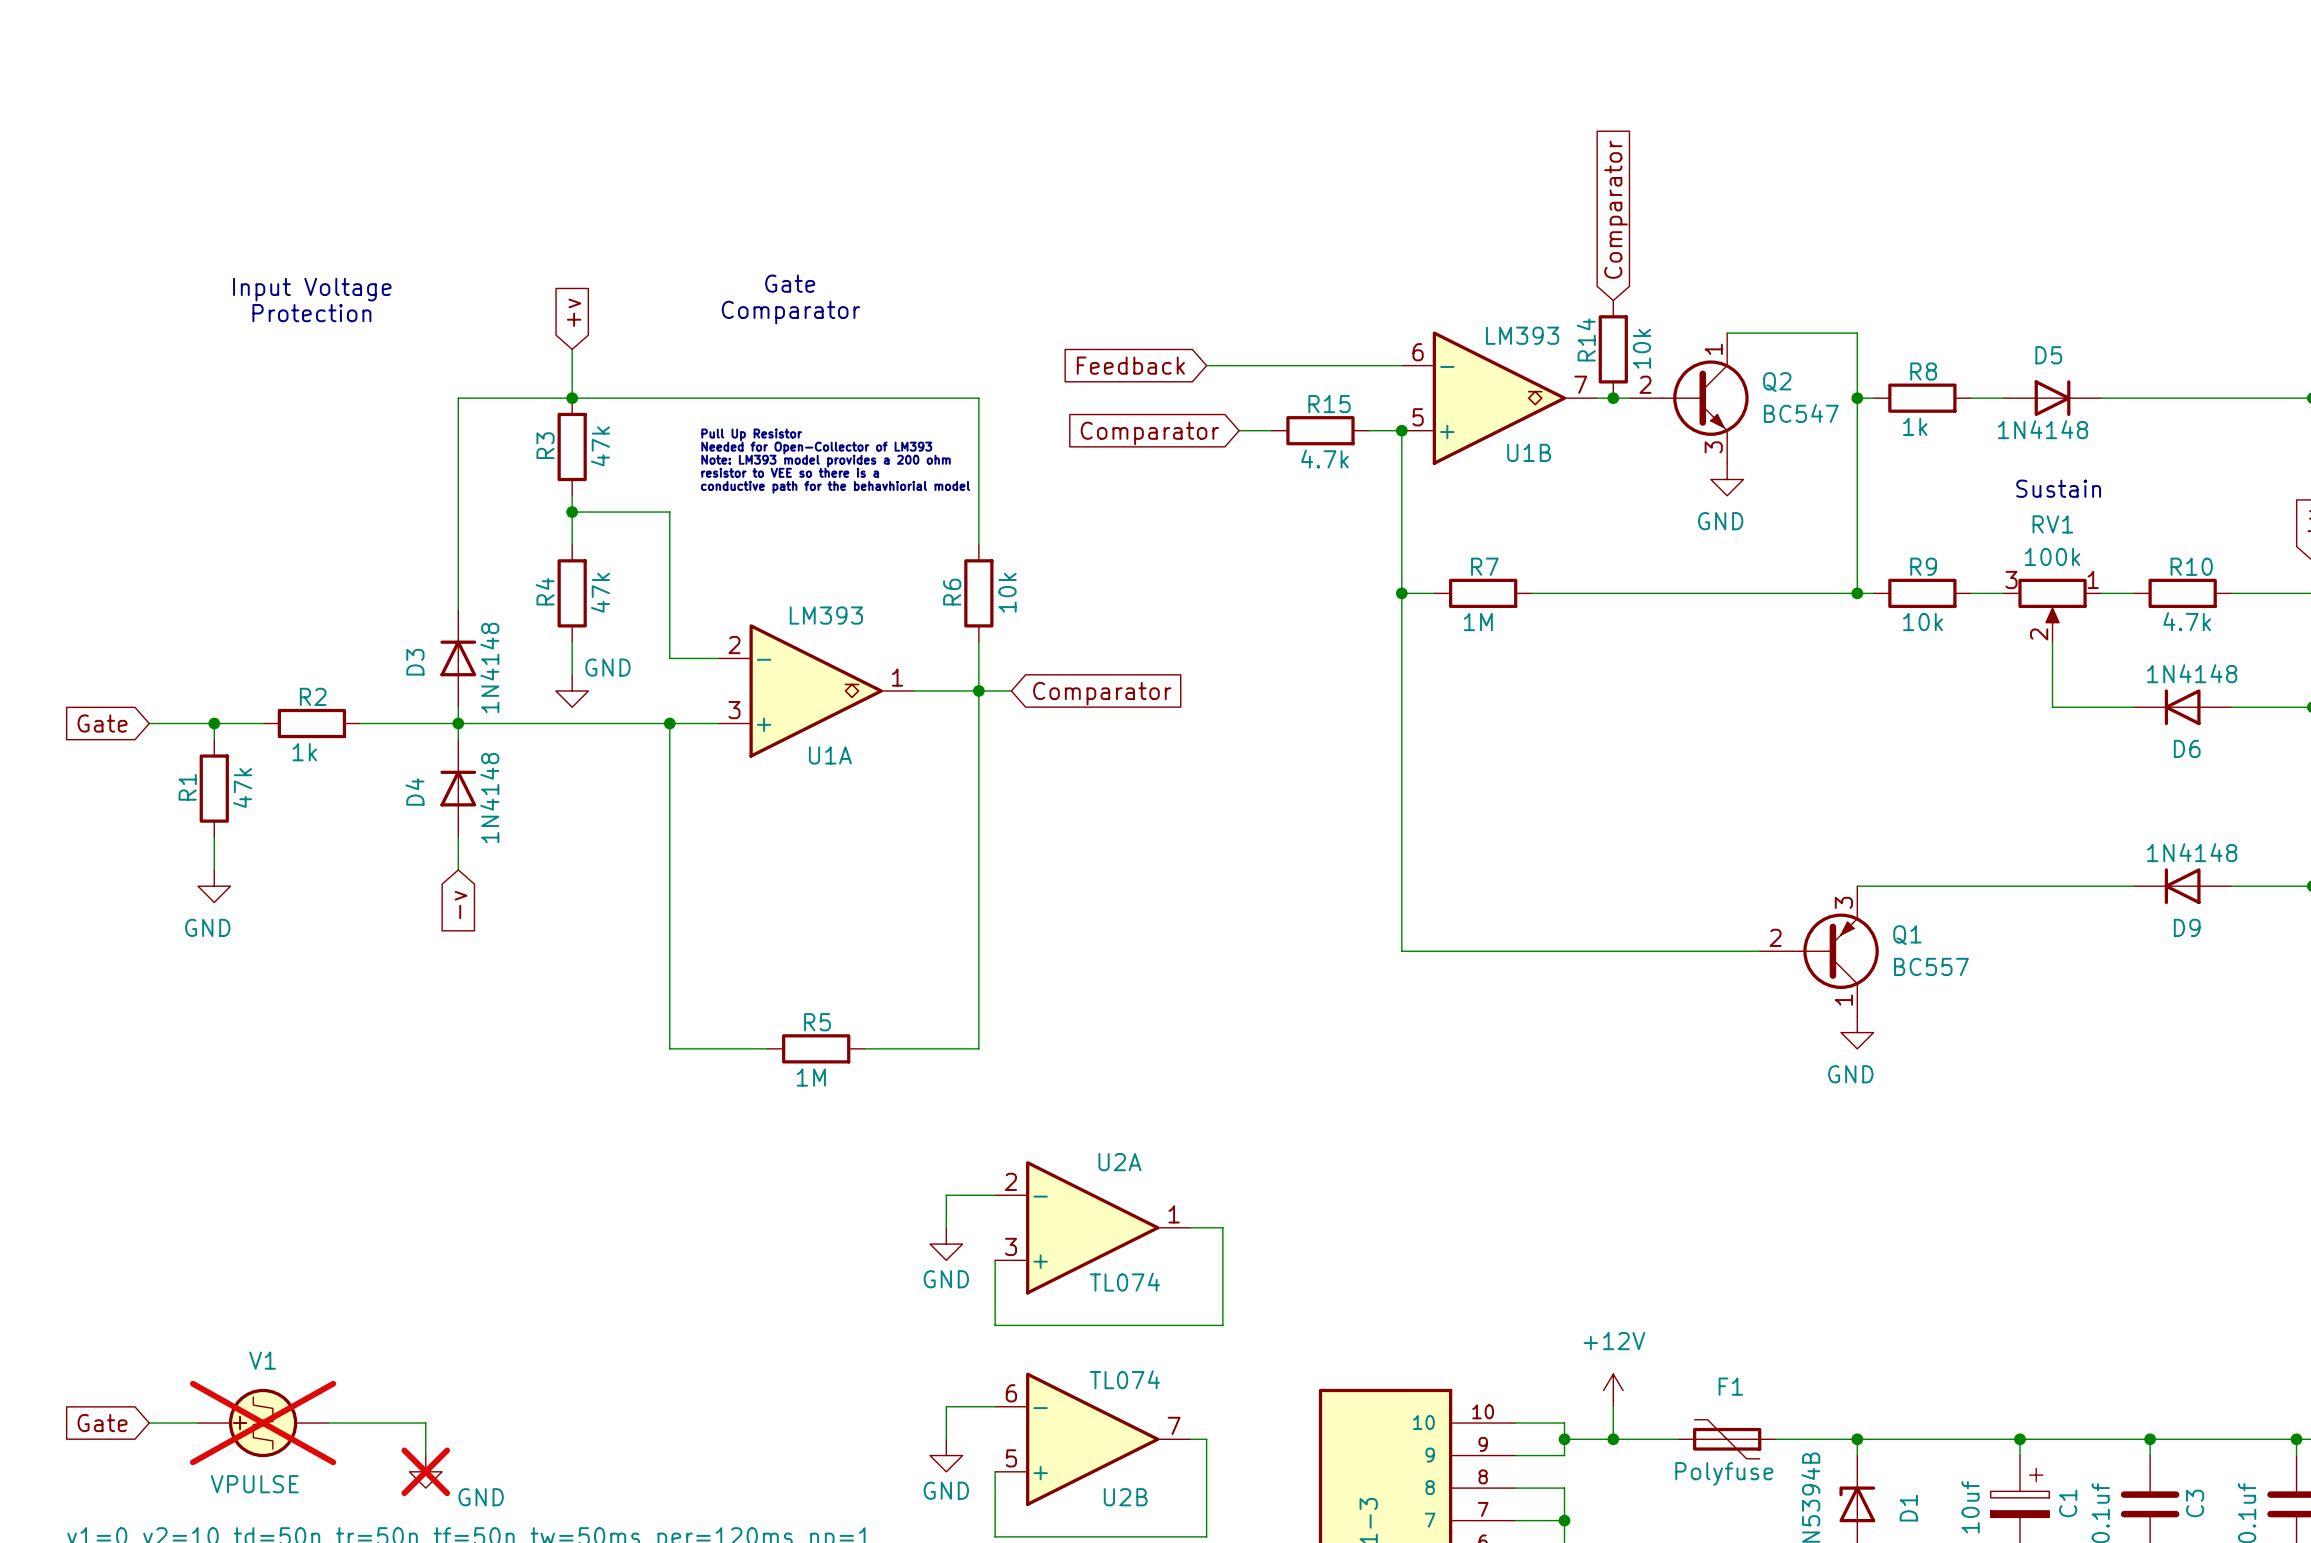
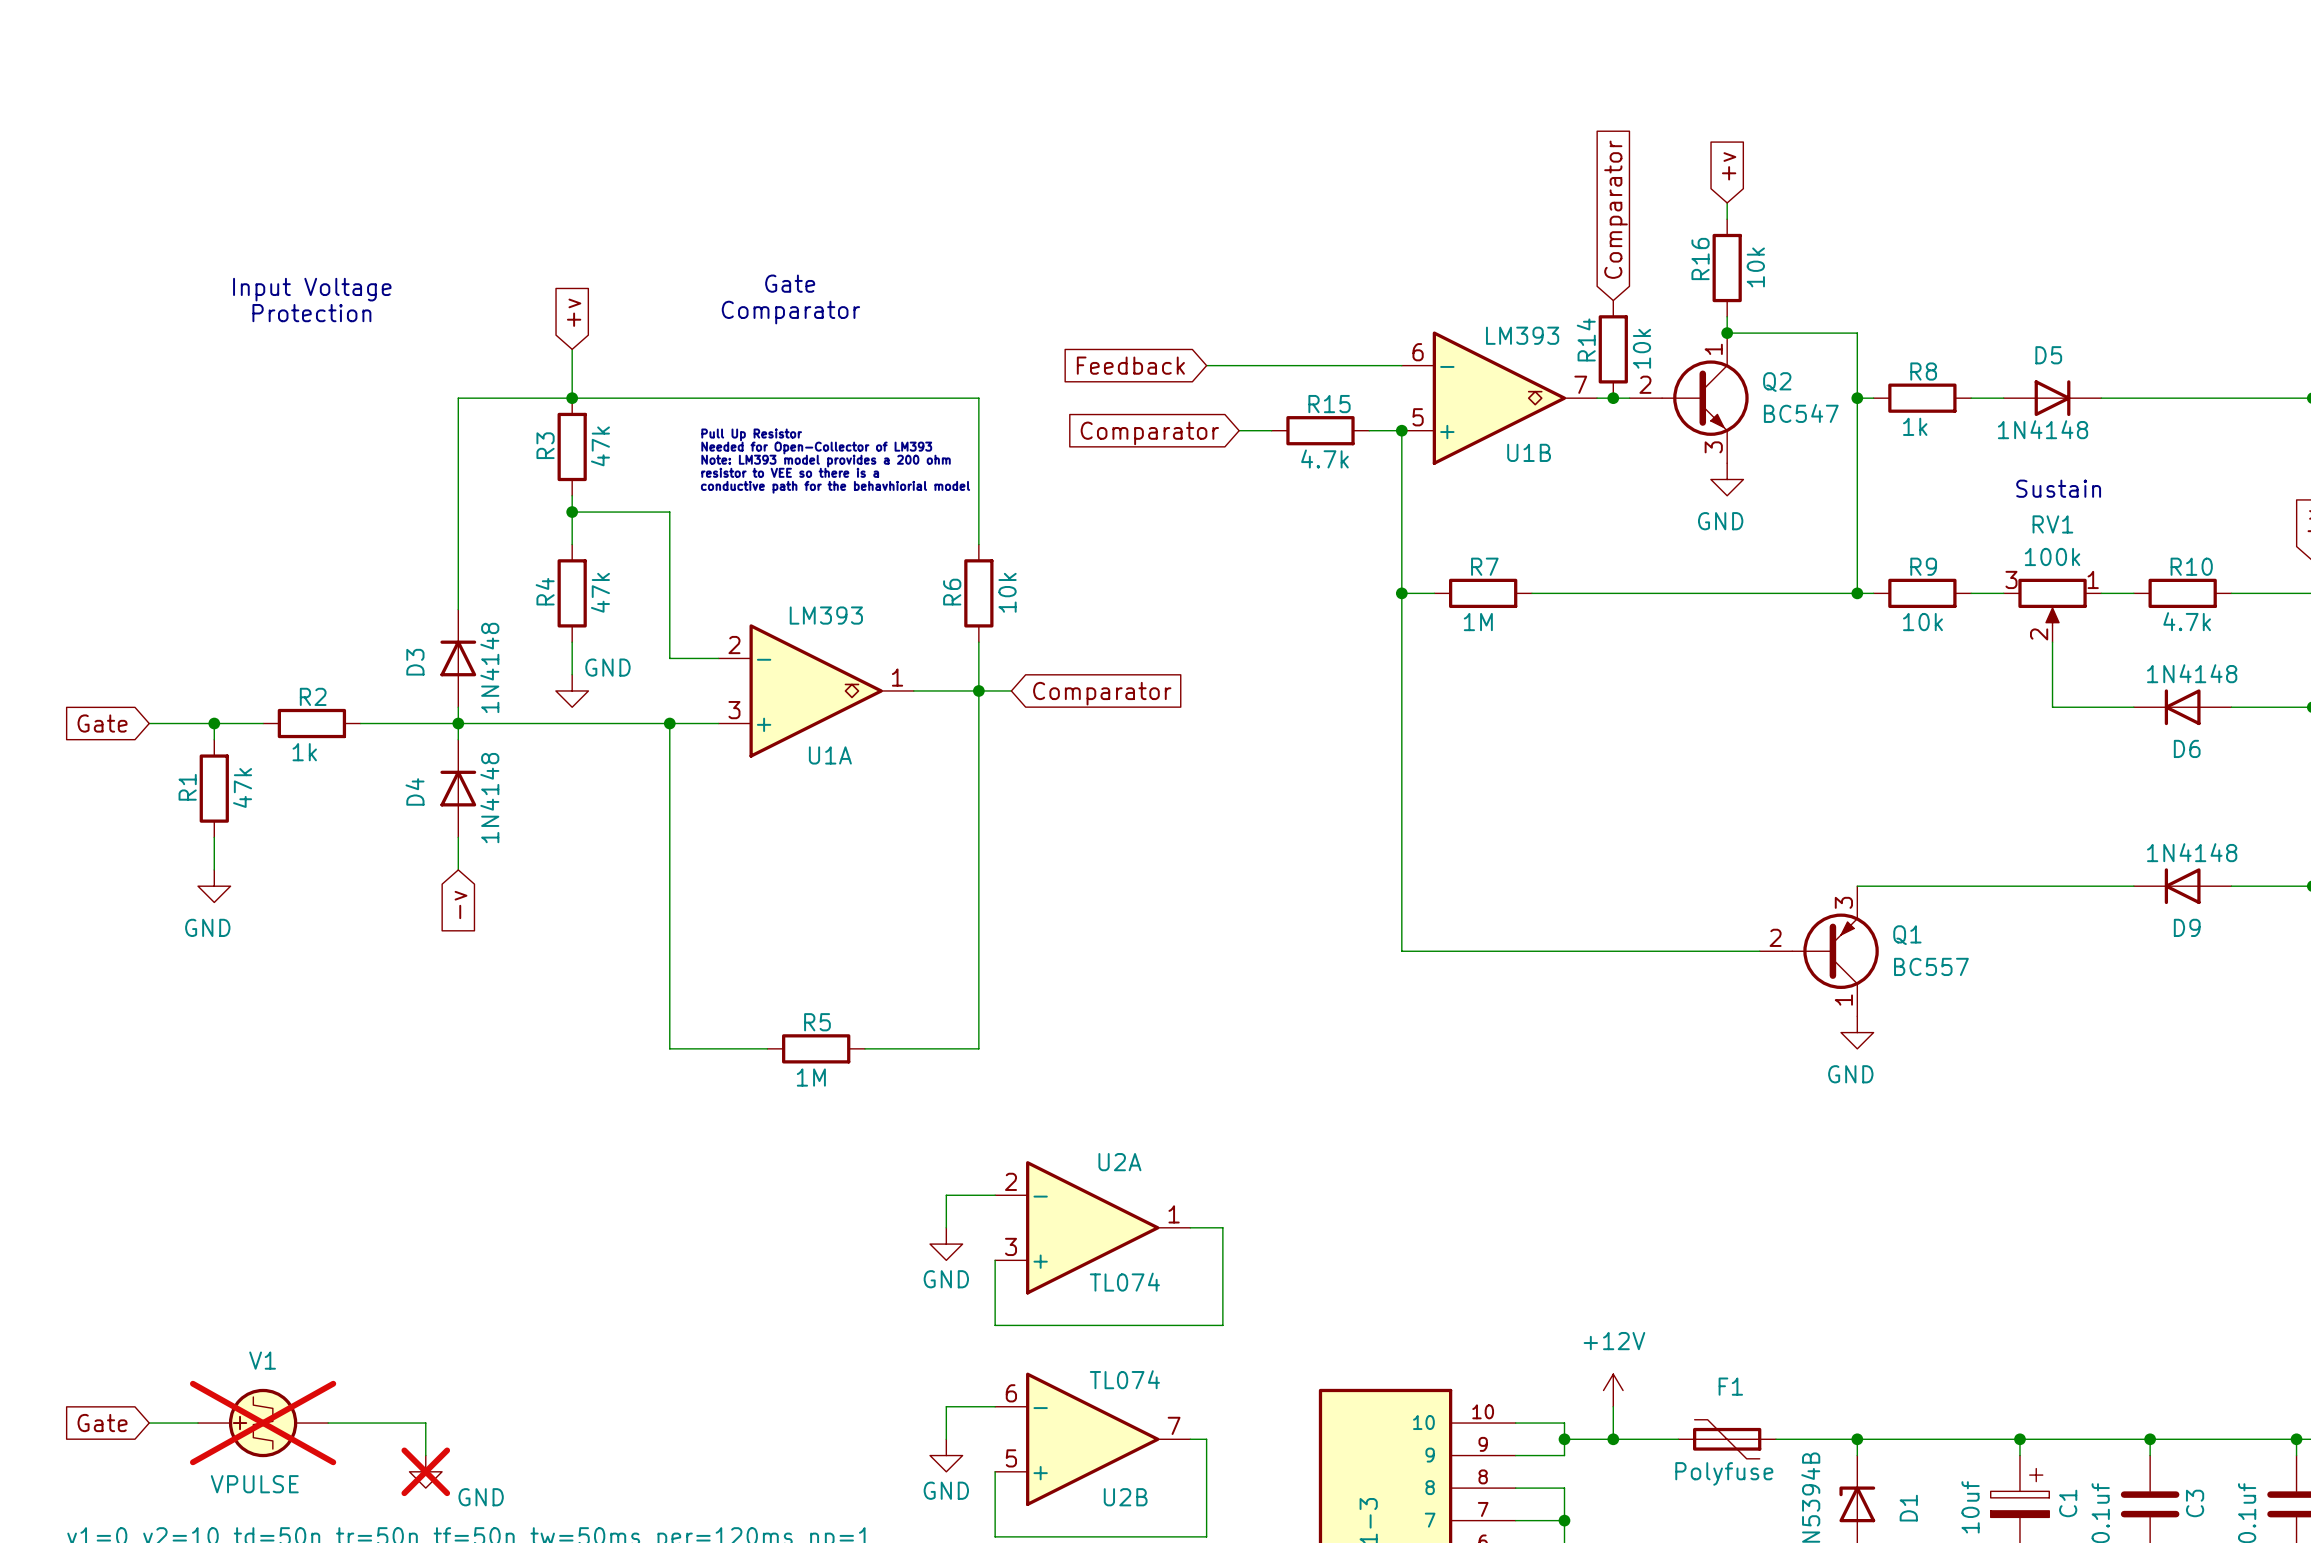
global label: none -> +v (1729, 166)
wire: none -> (1727, 202) (1727, 219)
R16: none -> 10k (1727, 268)
wire: none -> (1727, 316) (1727, 333)
junction: none -> (1727, 333)

